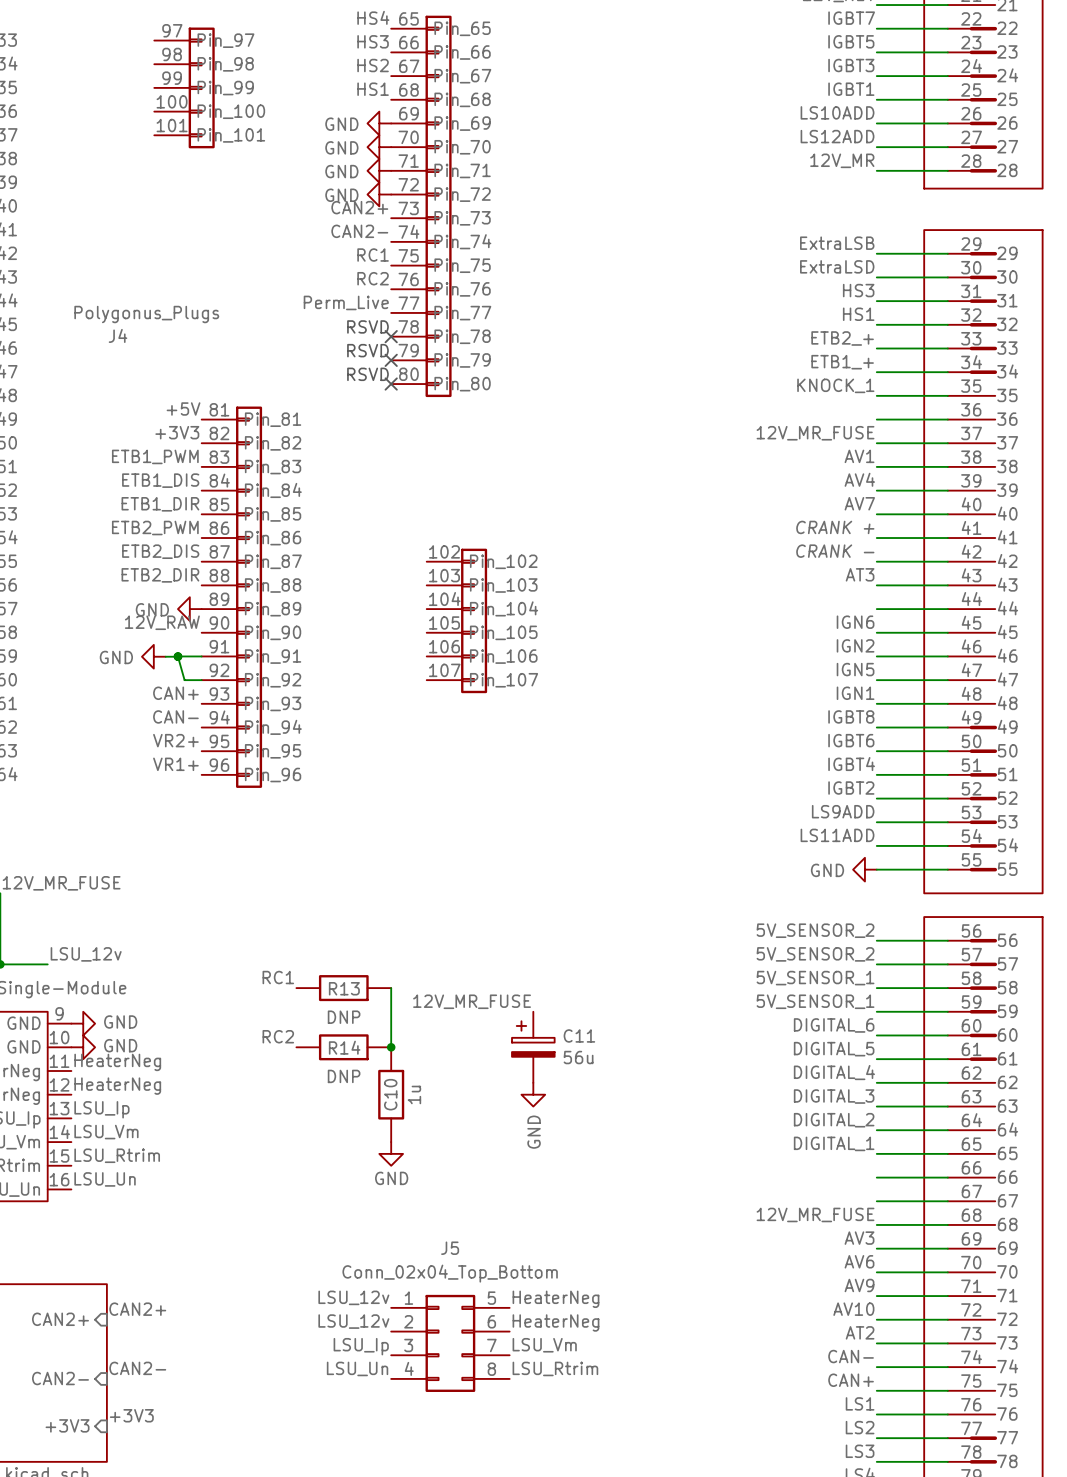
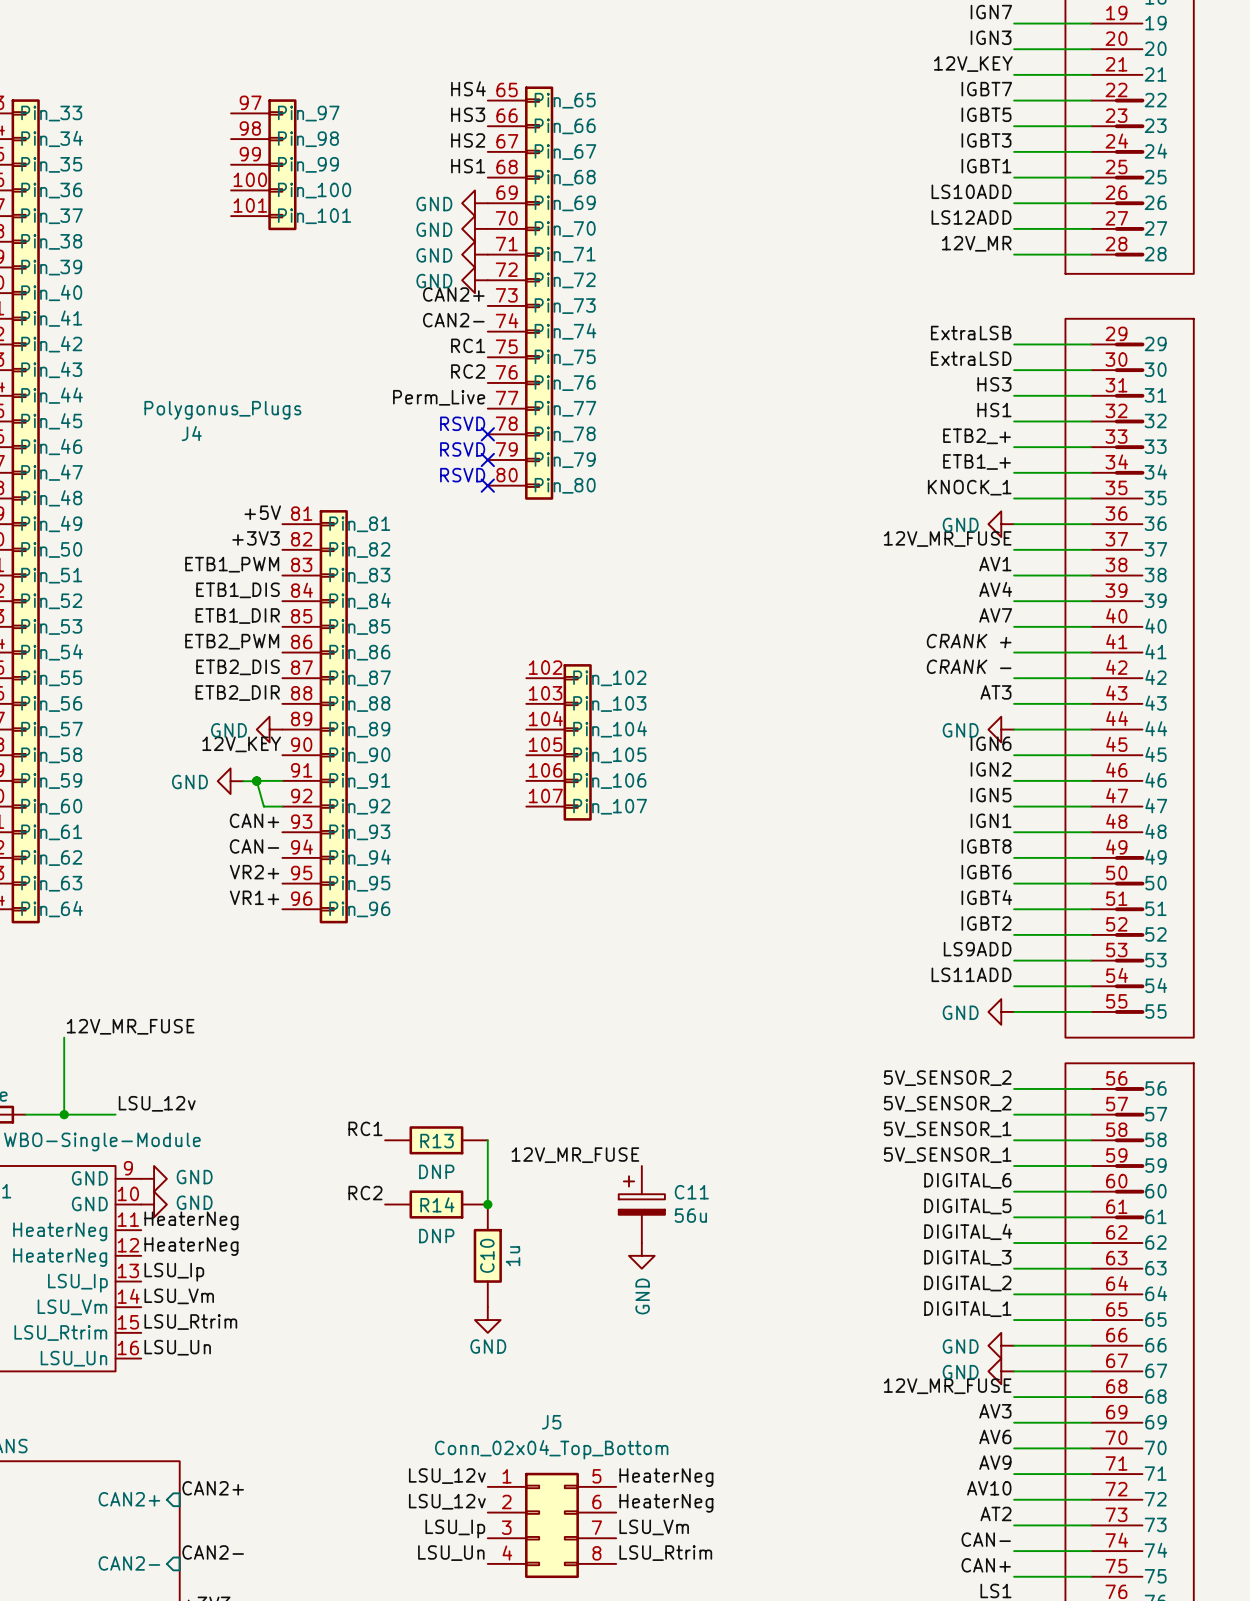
power symbol: none -> GND (1001, 524)
power symbol: none -> GND (1001, 729)
label: 12V_RAW (162, 622) -> 12V_KEY (241, 744)
power symbol: none -> GND (1001, 1345)
power symbol: none -> GND (1001, 1371)

